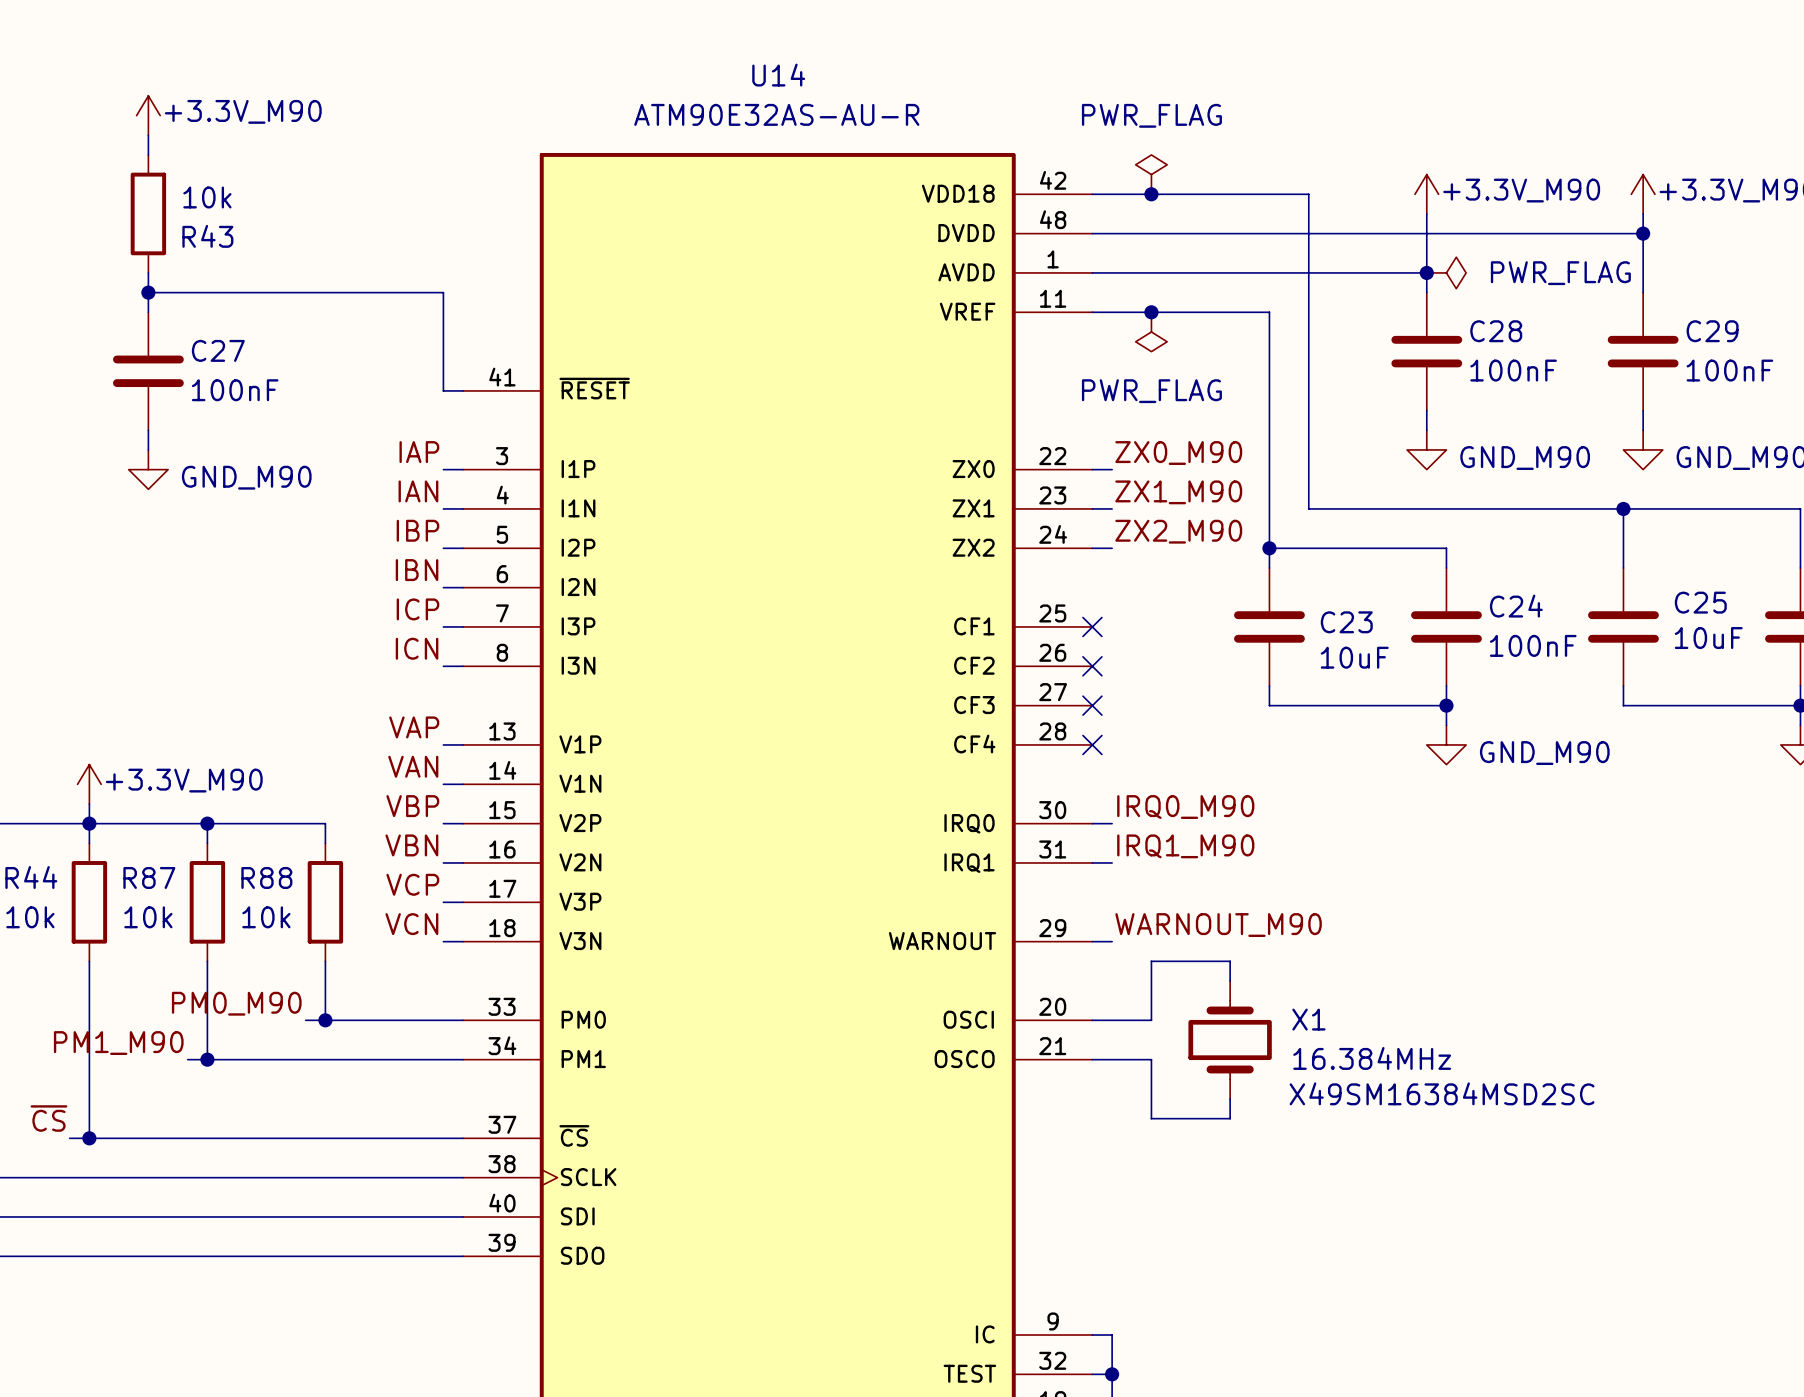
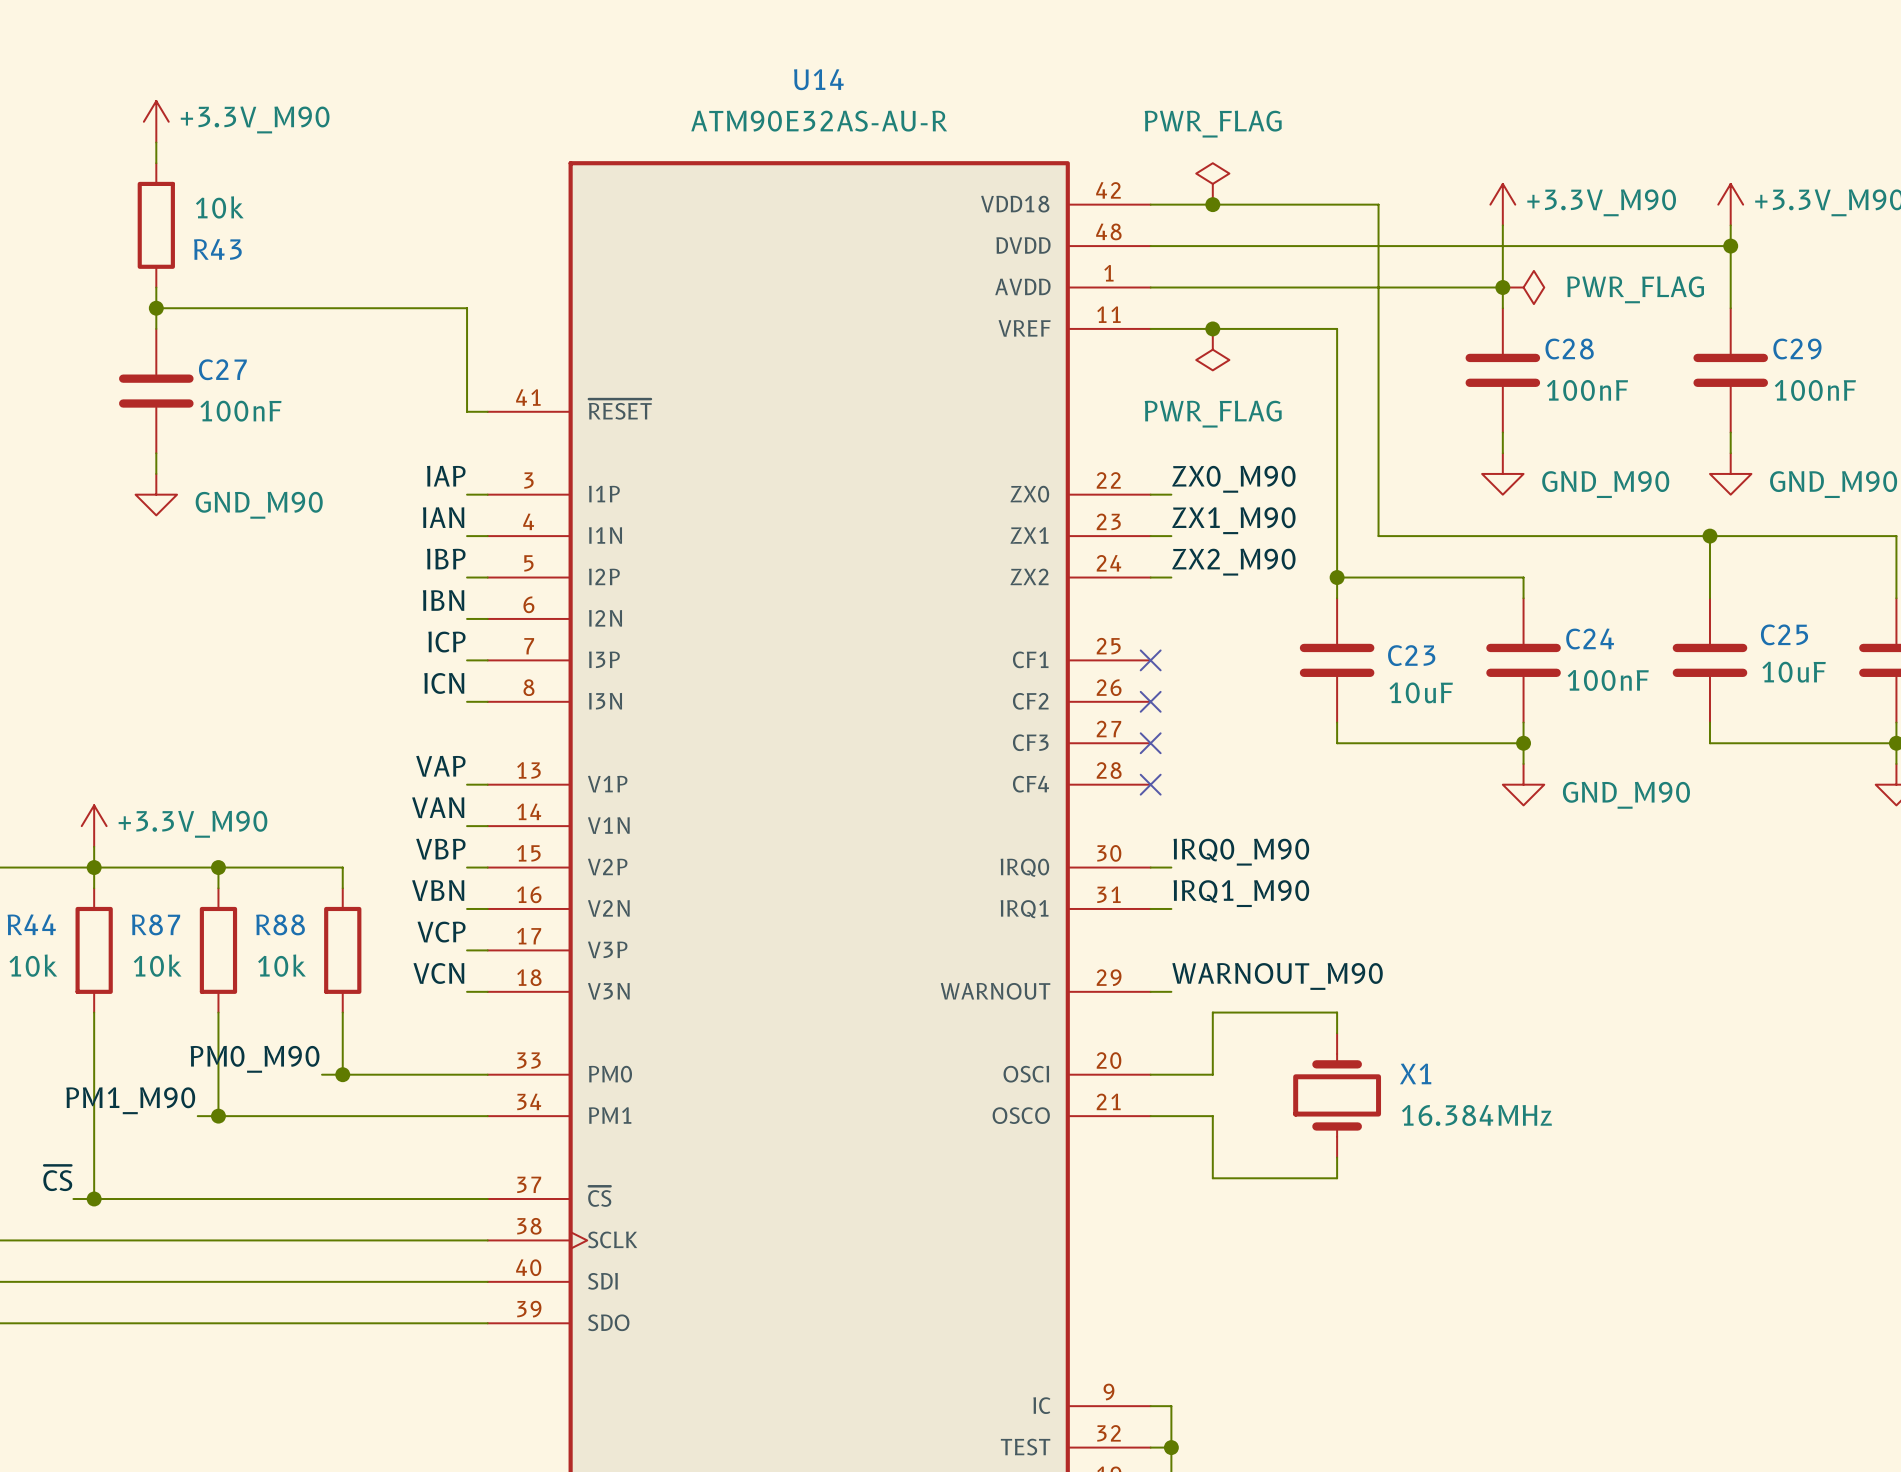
wire: (1230, 961) (1230, 980) -> (1295, 1012) (1337, 1012) (1337, 1033)
X1 position: (1230, 1039) -> (1337, 1095)
X1 text: X49SM16384MSD2SC (1442, 1093) -> none
wire: (1230, 1098) (1230, 1118) -> (1337, 1157) (1337, 1178) (1295, 1178)

